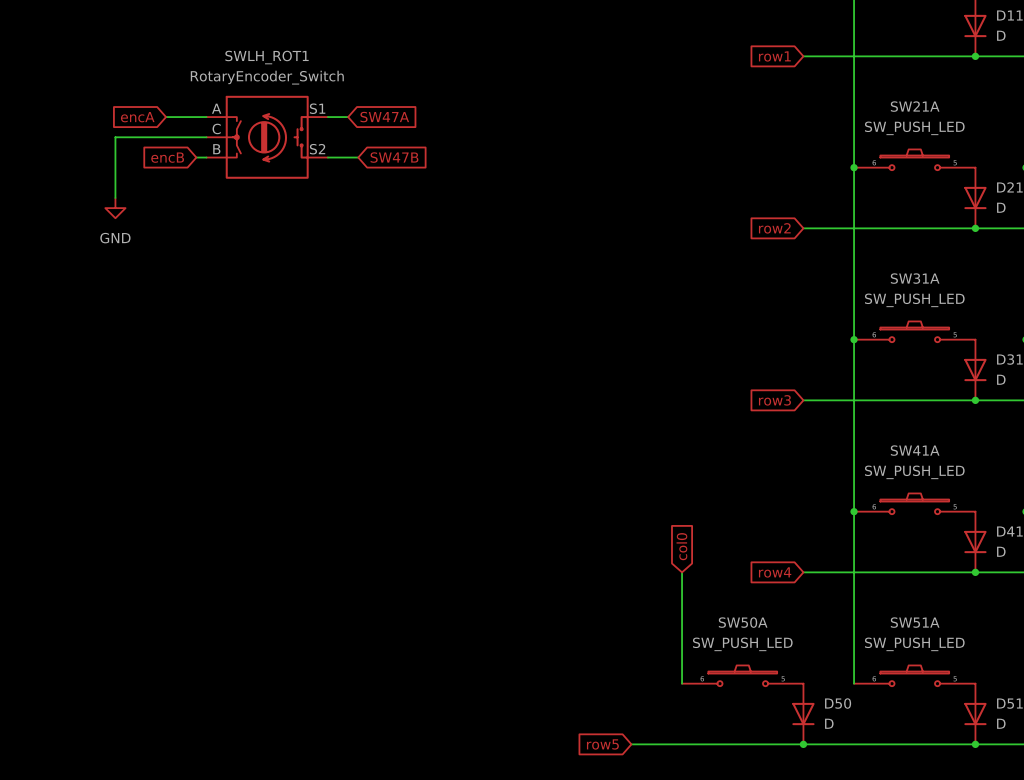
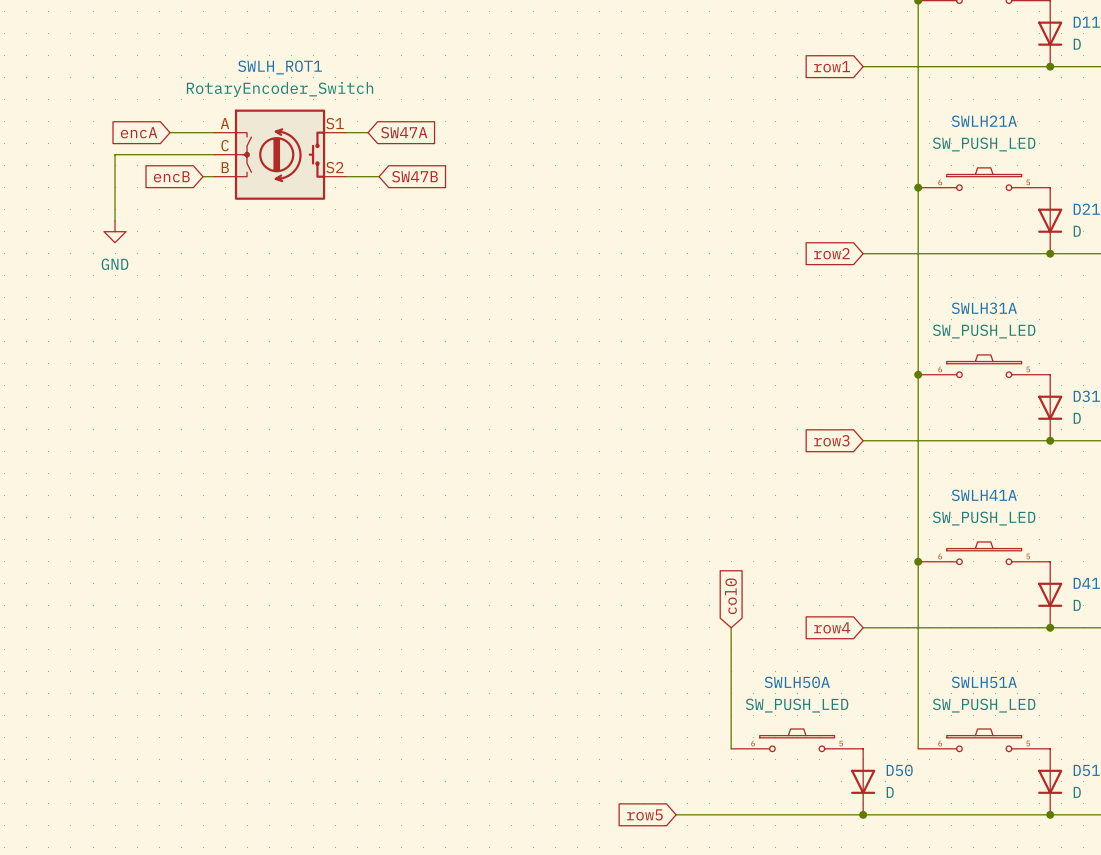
SW21A name: SW21A (915, 106) -> SWLH21A (984, 121)
SW31A name: SW31A (915, 278) -> SWLH31A (984, 308)
SW41A name: SW41A (915, 450) -> SWLH41A (984, 495)
SW50A name: SW50A (743, 622) -> SWLH50A (797, 682)
SW51A name: SW51A (915, 622) -> SWLH51A (984, 682)

